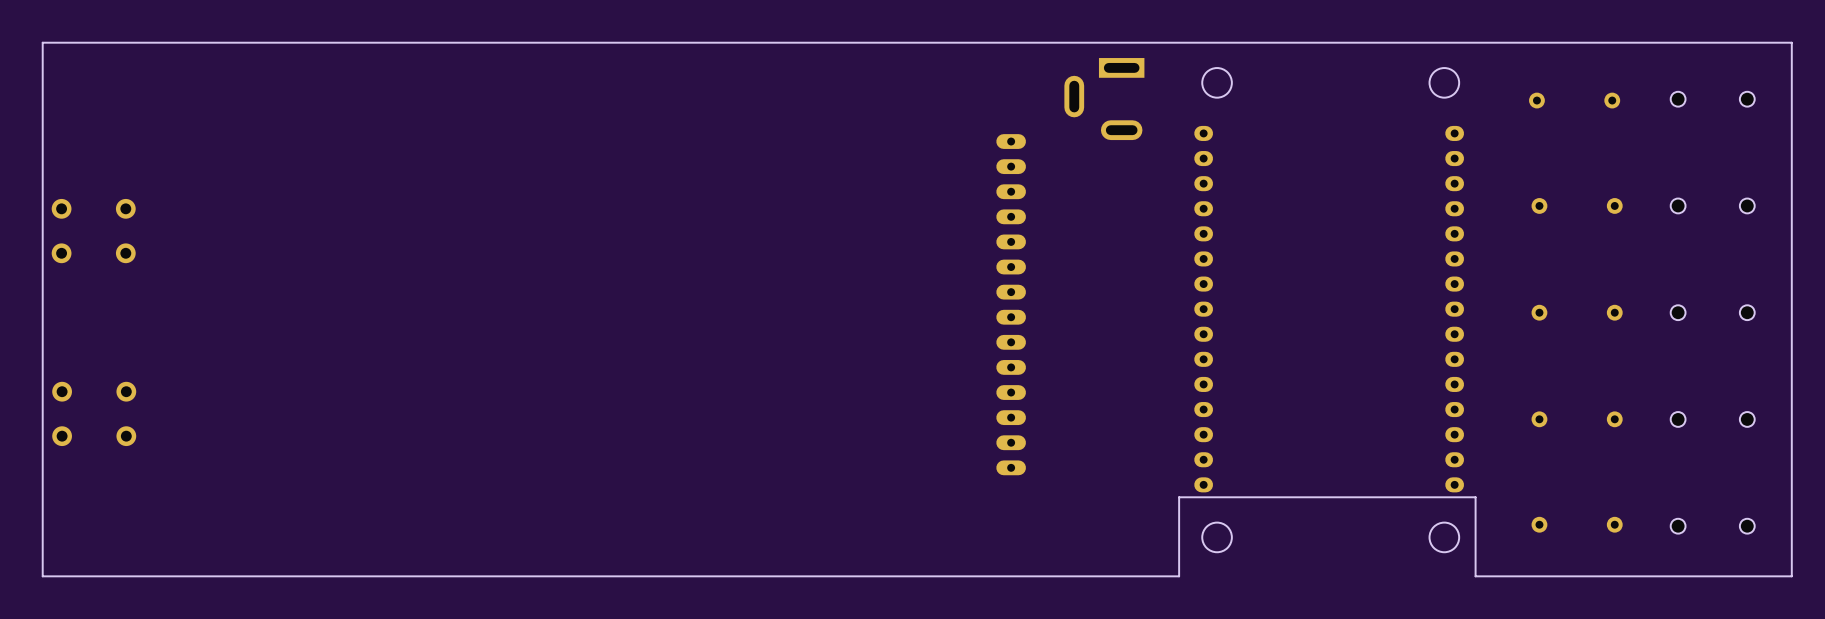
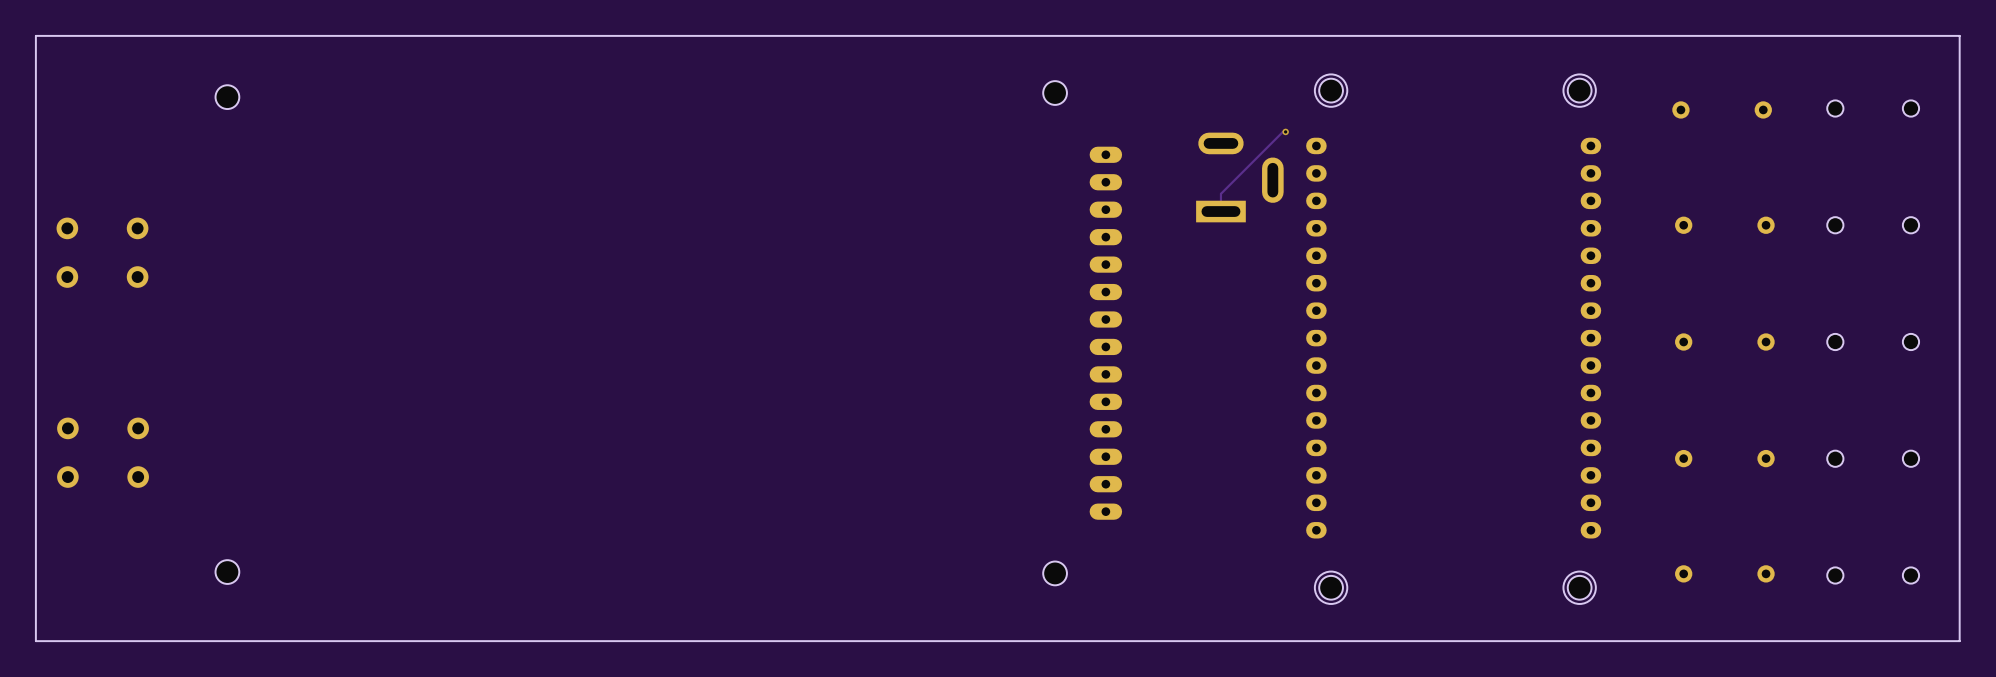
board edge: (1791, 42) (42, 42) (42, 576) (1179, 576) (1179, 497) (1475, 497) (1475, 576) (1791, 576) -> (1959, 46) (1959, 35) (35, 35) (35, 641) (1959, 641) (1959, 630)
part: none -> (1331, 90)
part: none -> (1579, 90)
part: none -> (1055, 93)
part: none -> (227, 97)
part rotation: 0° (1104, 99) -> 180° (1239, 177)
part position: (1104, 99) -> (1239, 177)
track: none -> (1285, 131) (1282, 131) (1220, 193) (1220, 211)
via: none -> (1285, 131)
part: none -> (227, 572)
part: none -> (1055, 573)
part: none -> (1331, 587)
part: none -> (1579, 587)

